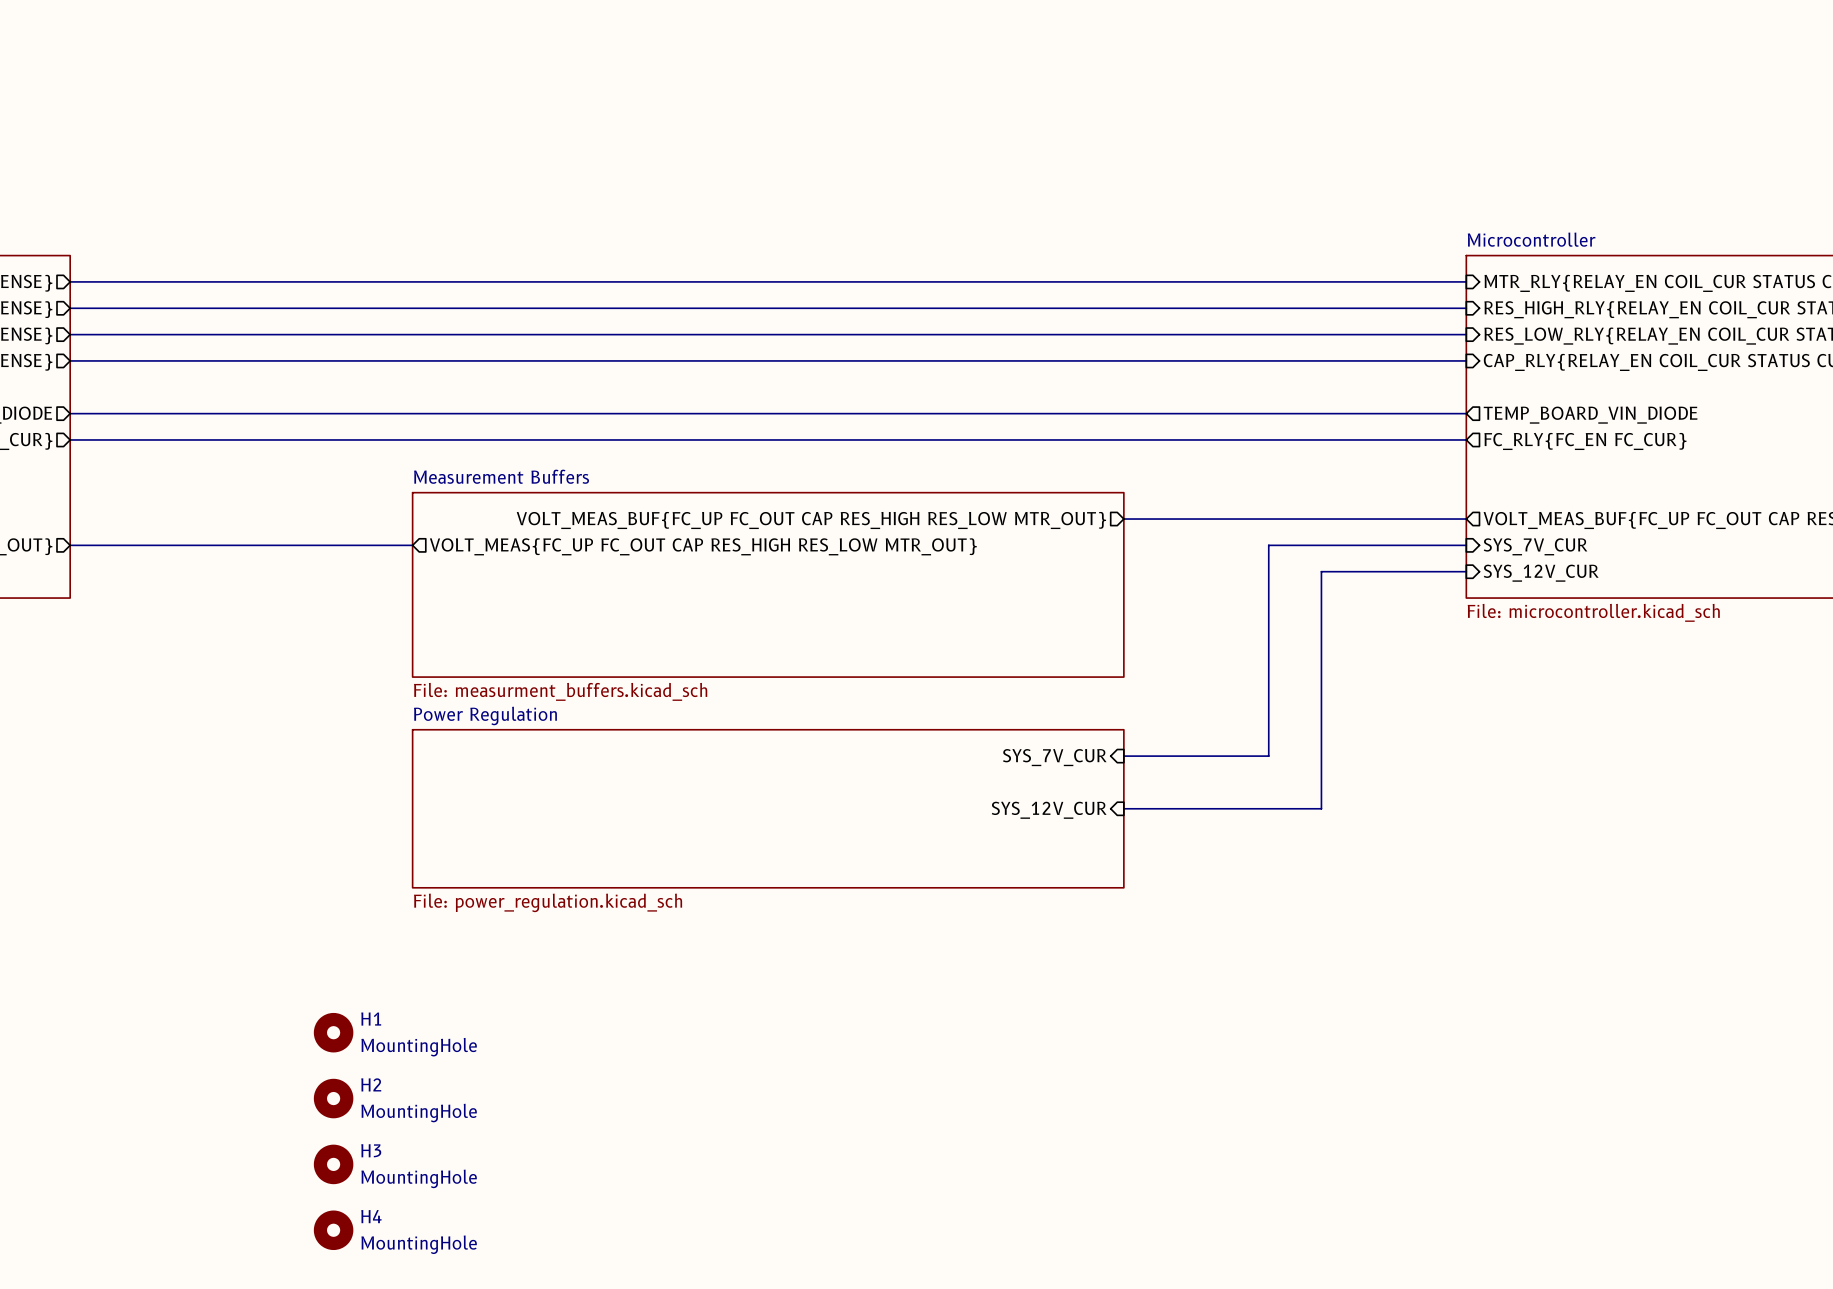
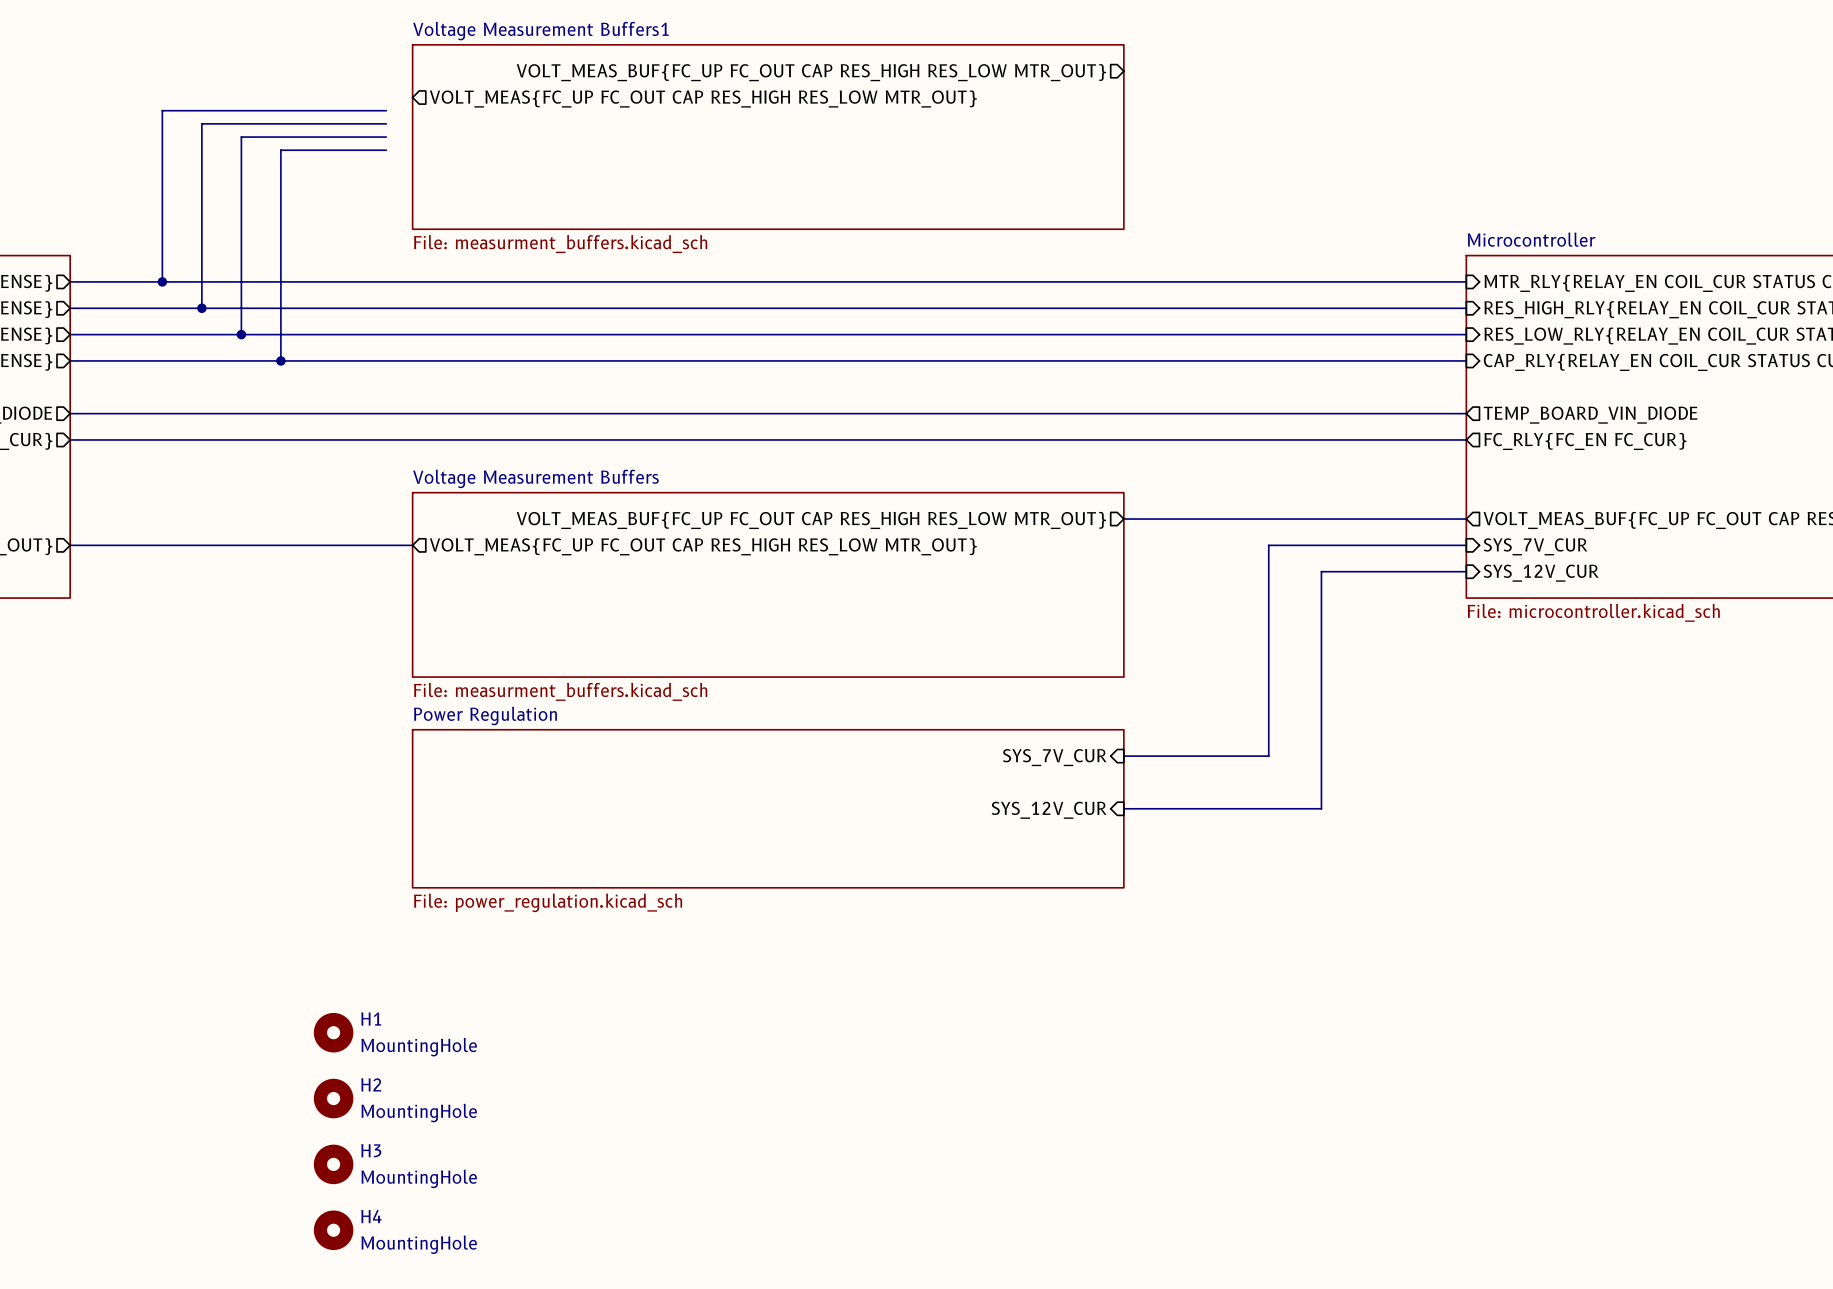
sheet pin: none -> VOLT_MEAS_BUF{FC_UP FC_OUT CAP RES_HIGH RES_LOW MTR_OUT} (811, 72)
sheet pin: none -> VOLT_MEAS{FC_UP FC_OUT CAP RES_HIGH RES_LOW MTR_OUT} (703, 99)
bus: none -> (386, 110) (162, 110) (162, 281)
bus: none -> (386, 123) (201, 123) (201, 308)
bus: none -> (386, 137) (241, 137) (241, 334)
sheet Voltage Measurement Buffers1: none -> File: measurment_buffers.kicad_sch (768, 137)
bus: none -> (386, 150) (280, 150) (280, 360)
junction: none -> (162, 281)
junction: none -> (201, 308)
junction: none -> (241, 334)
junction: none -> (280, 360)
sheet Measurement Buffers name: Measurement Buffers (501, 476) -> Voltage Measurement Buffers (535, 478)

